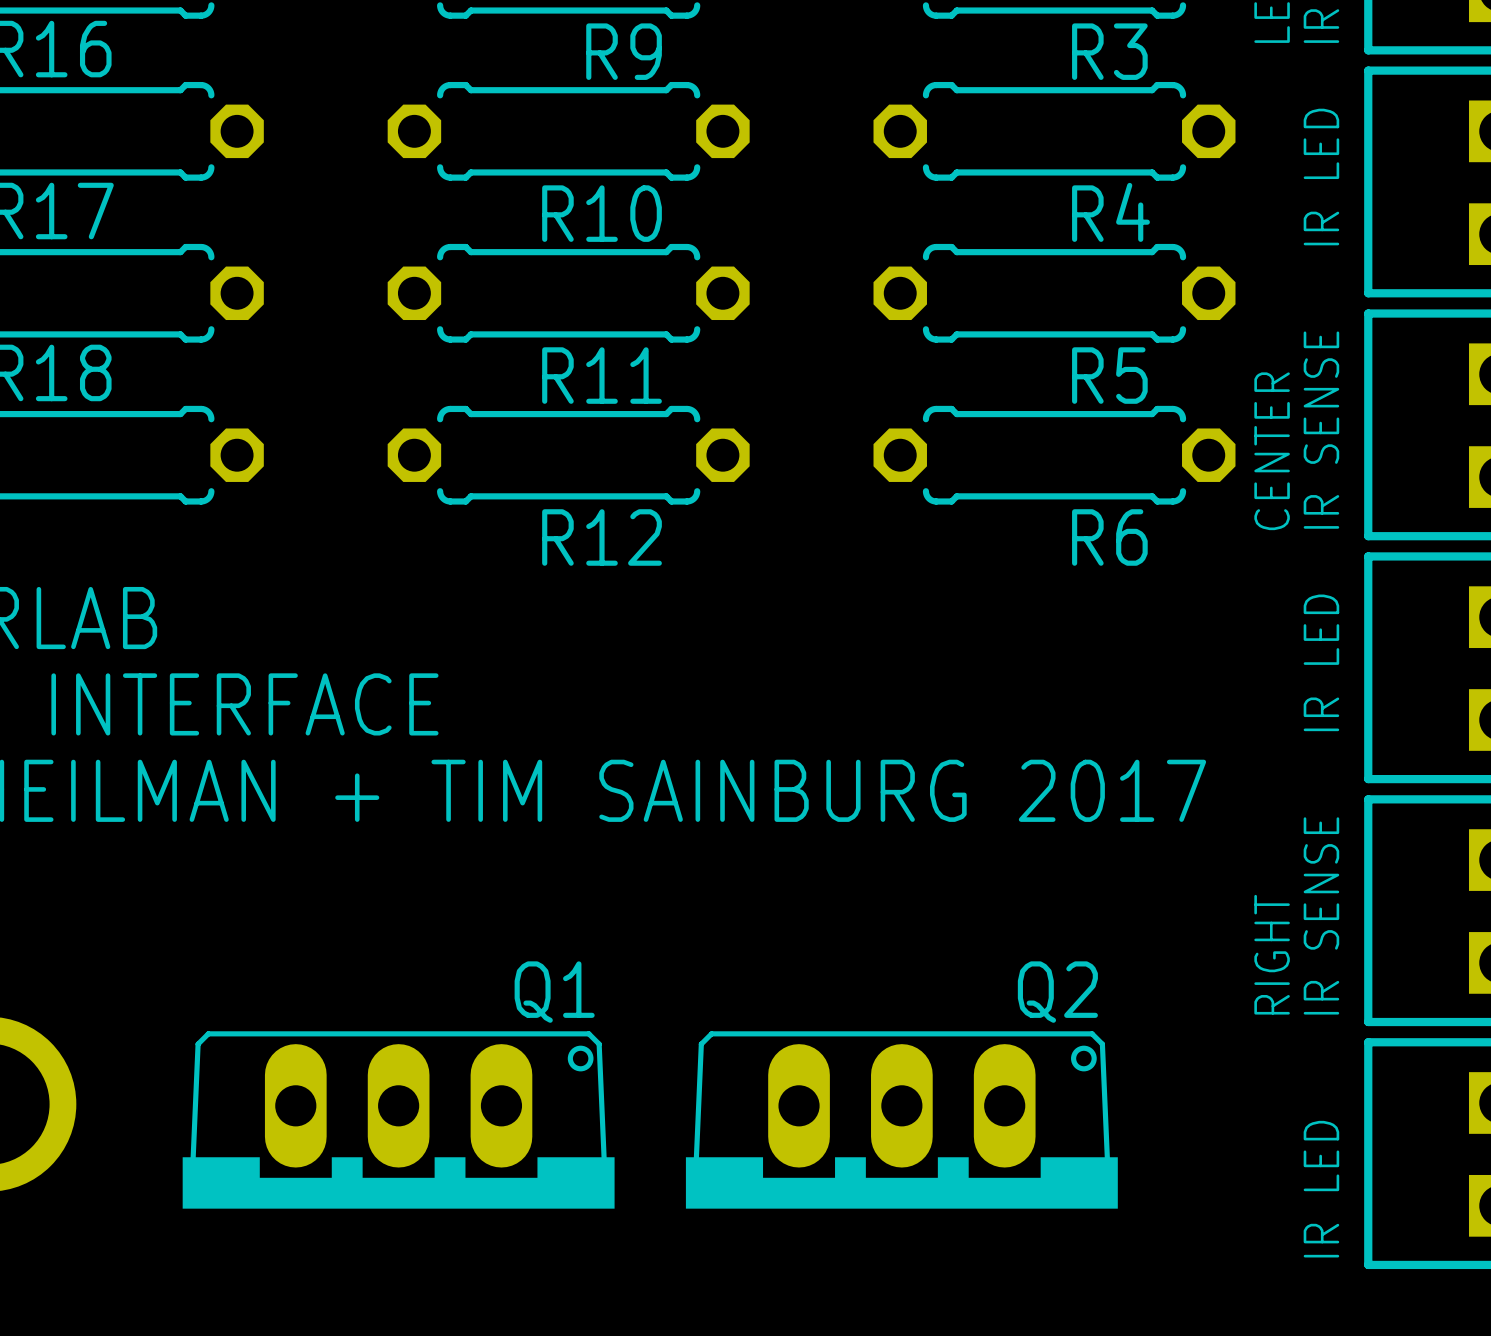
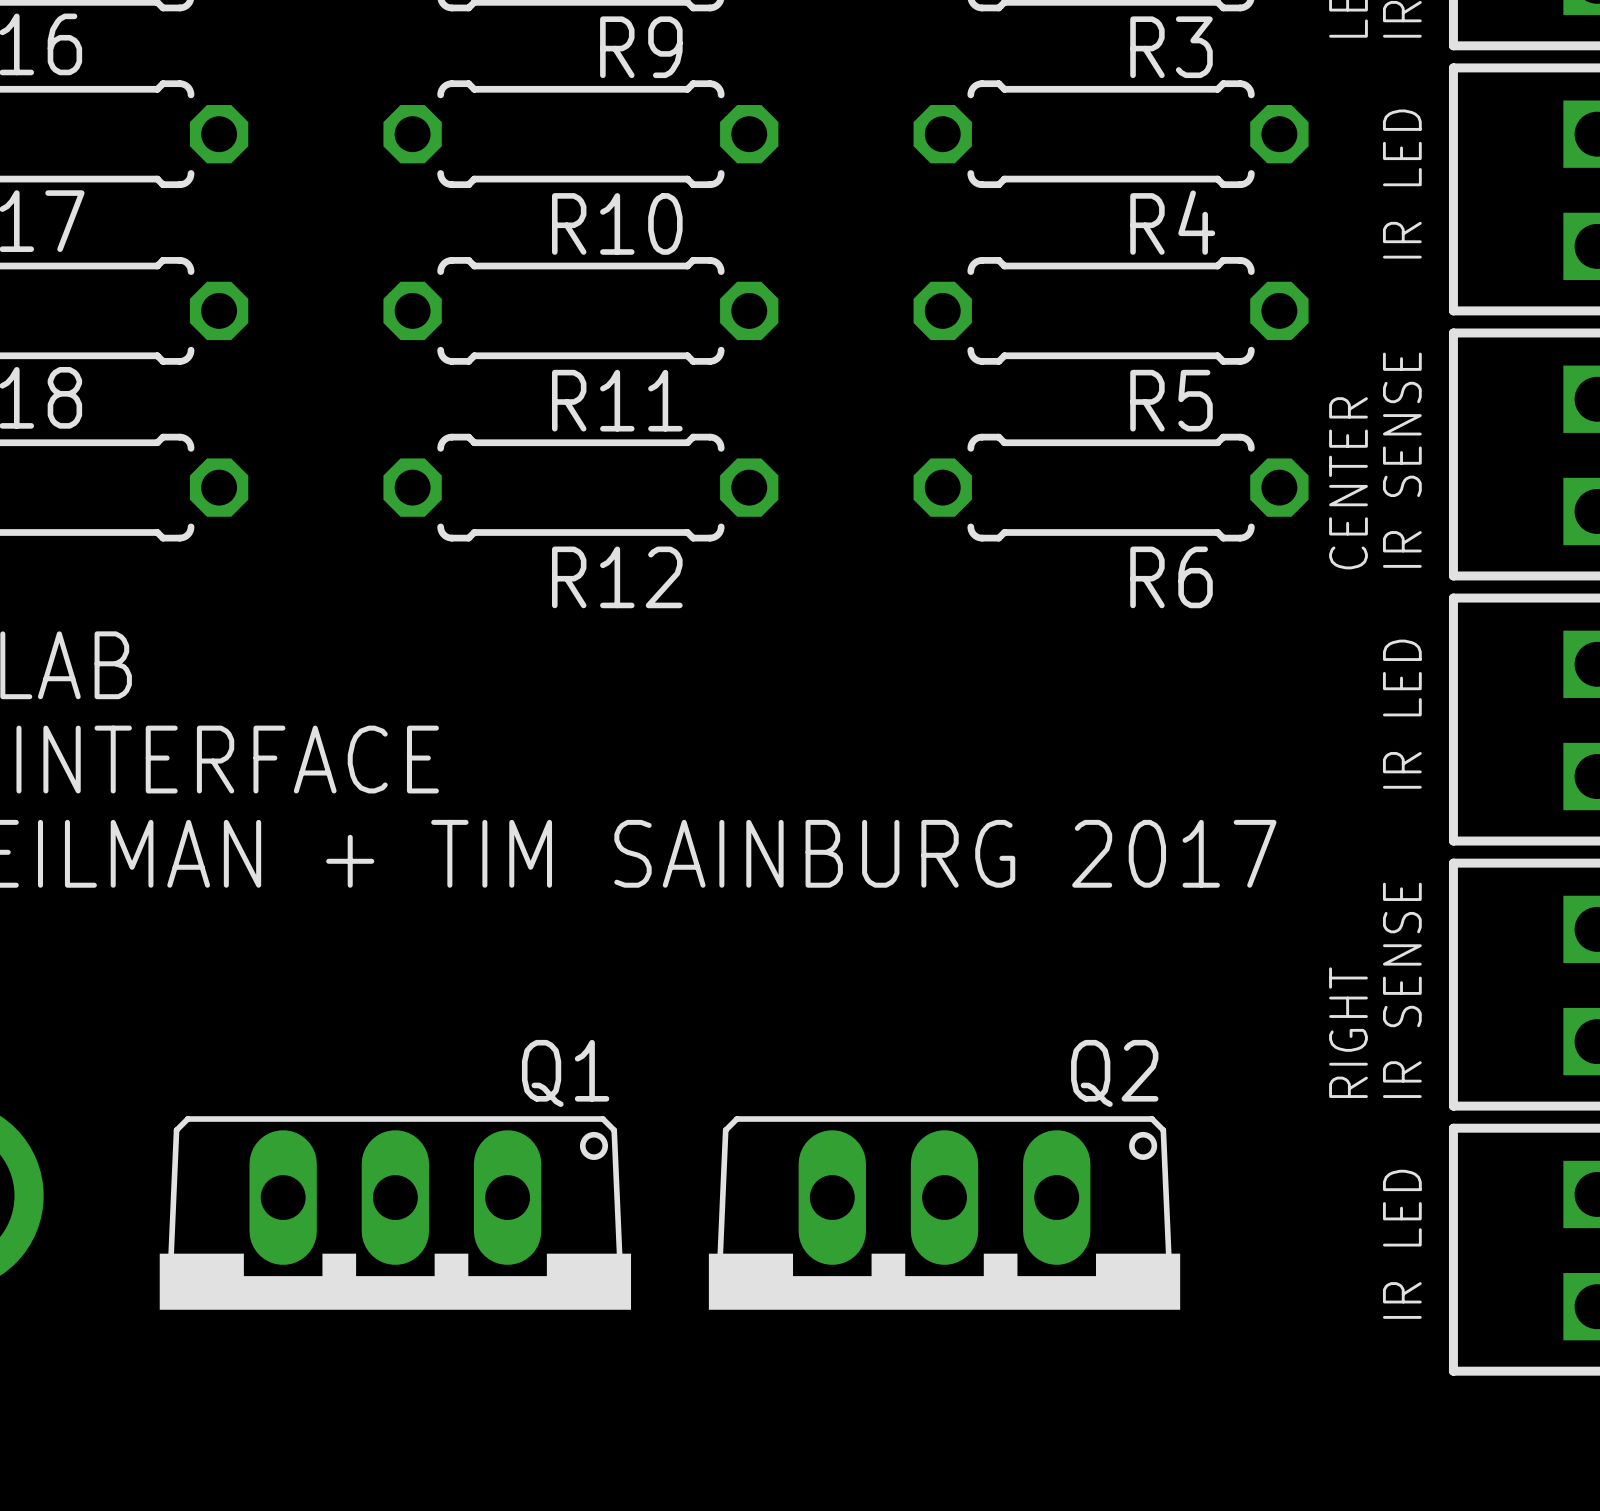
text position: IR LED (1321, 1189) -> IR LED (1402, 1244)

